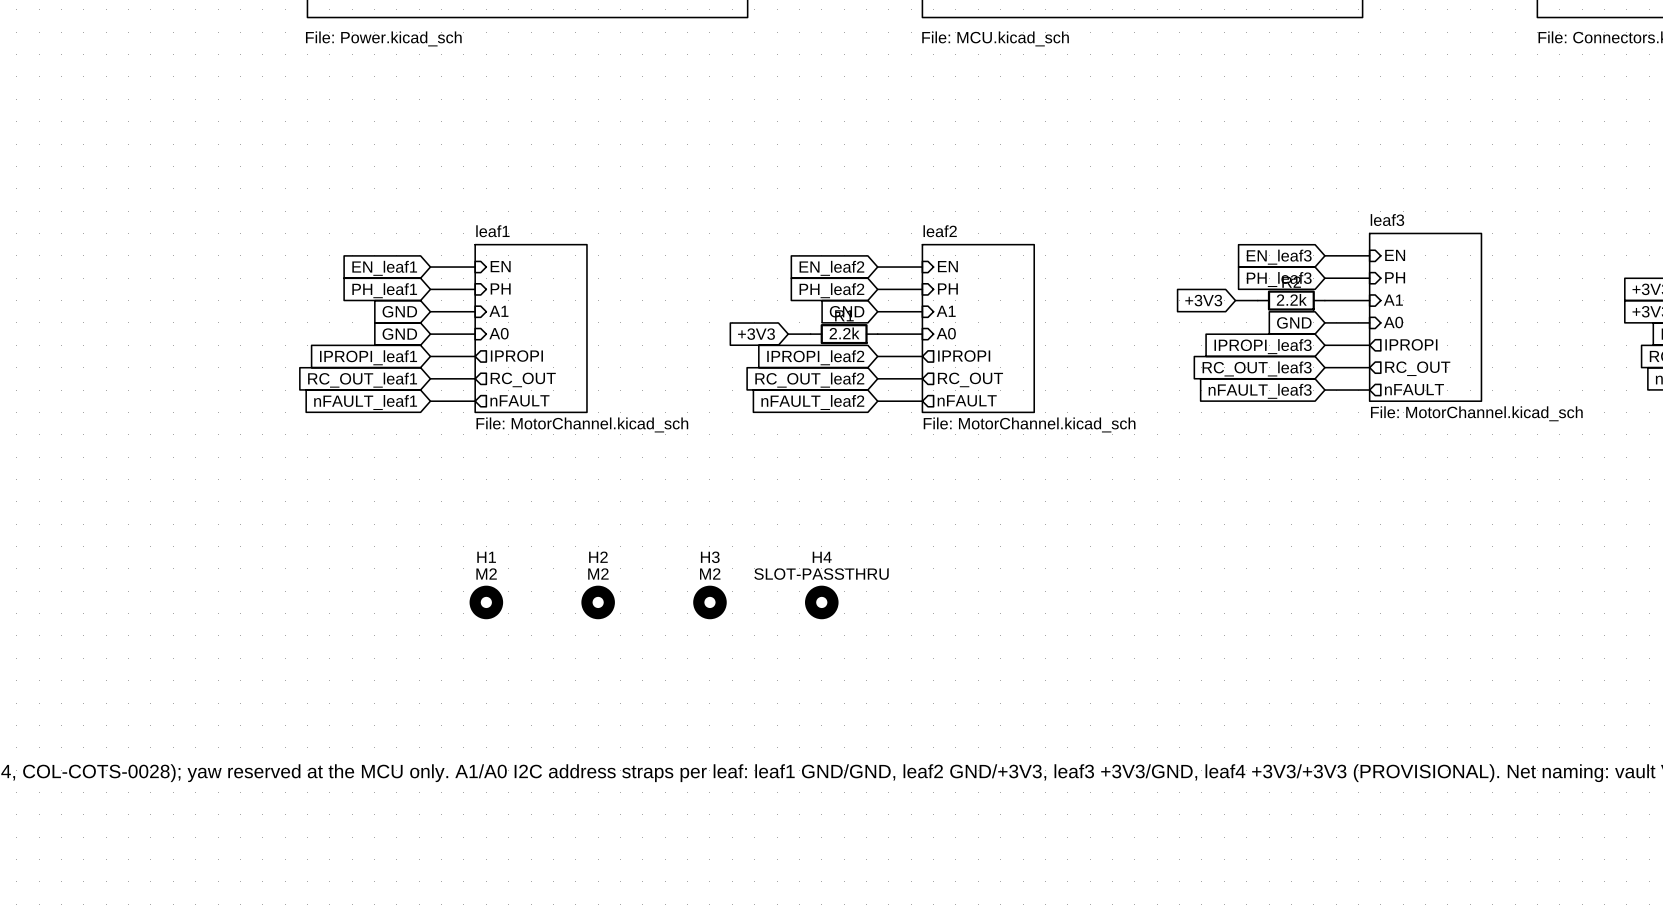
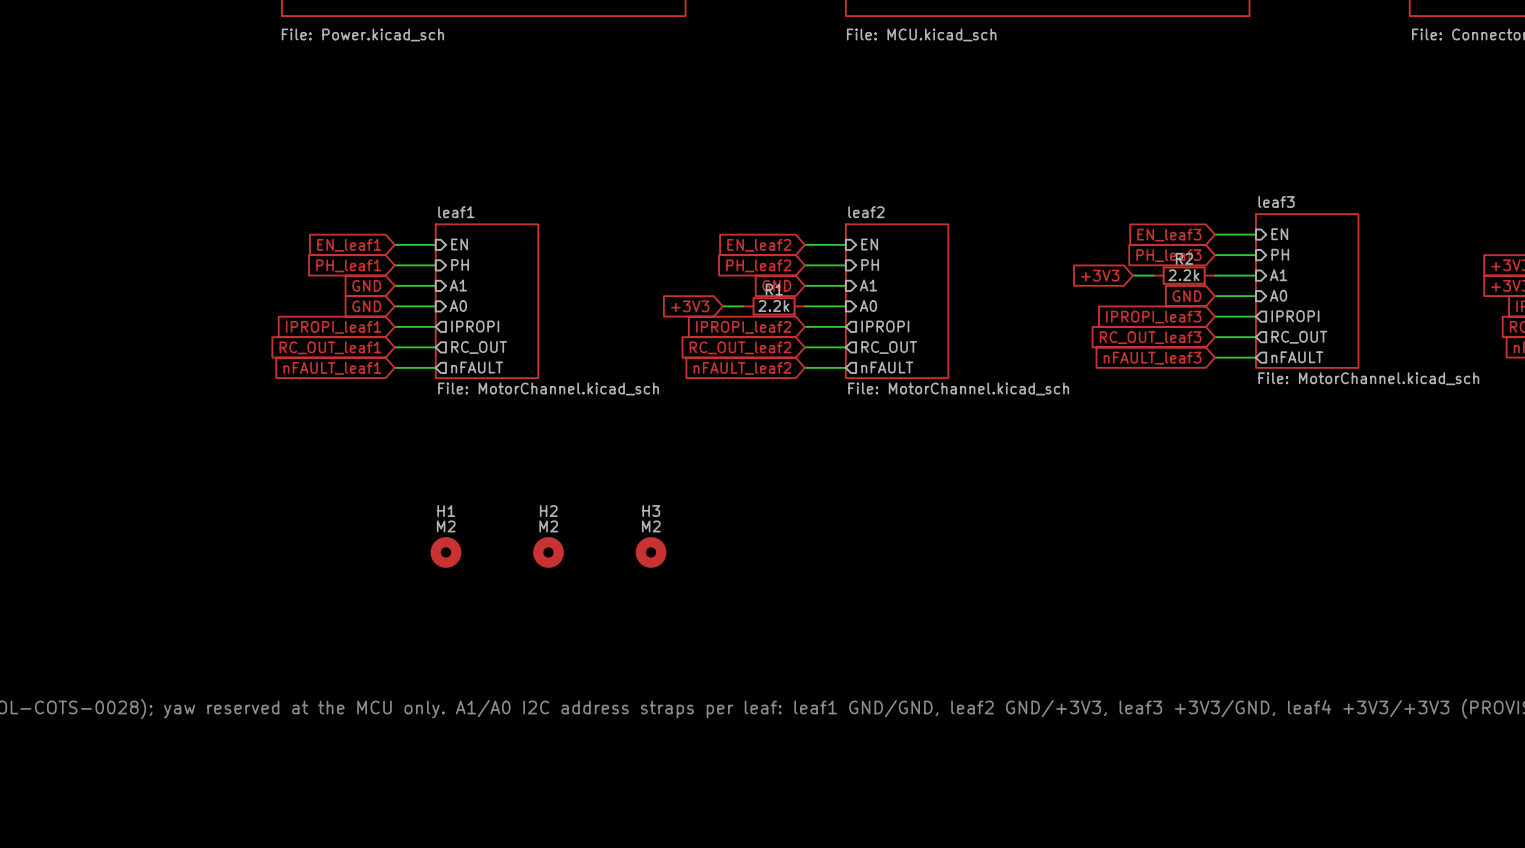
H4: SLOT-PASSTHRU (821, 602) -> none

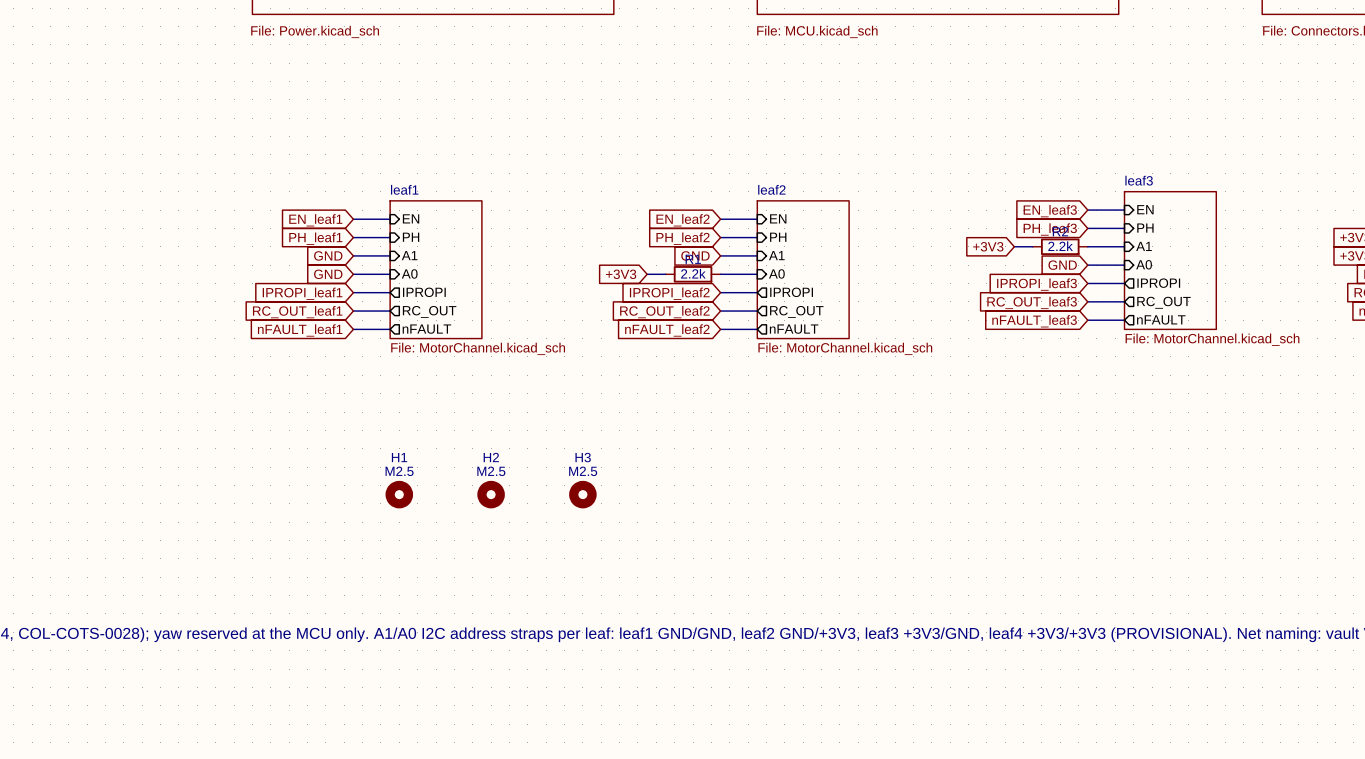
H1 value: M2 (446, 526) -> M2.5 (399, 471)
H2 value: M2 (548, 526) -> M2.5 (491, 471)
H3 value: M2 (651, 526) -> M2.5 (583, 471)

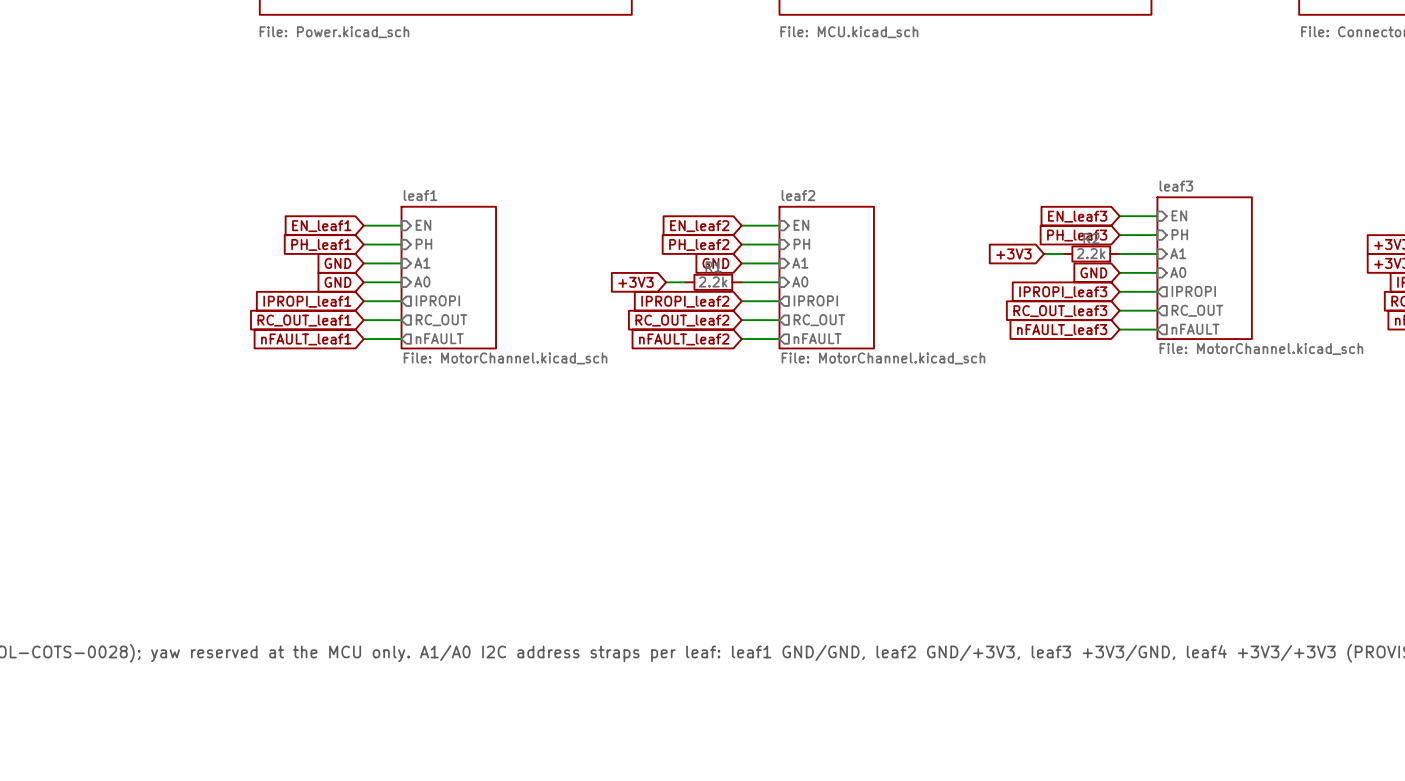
H1: M2.5 (399, 494) -> none
H2: M2.5 (491, 494) -> none
H3: M2.5 (582, 494) -> none

